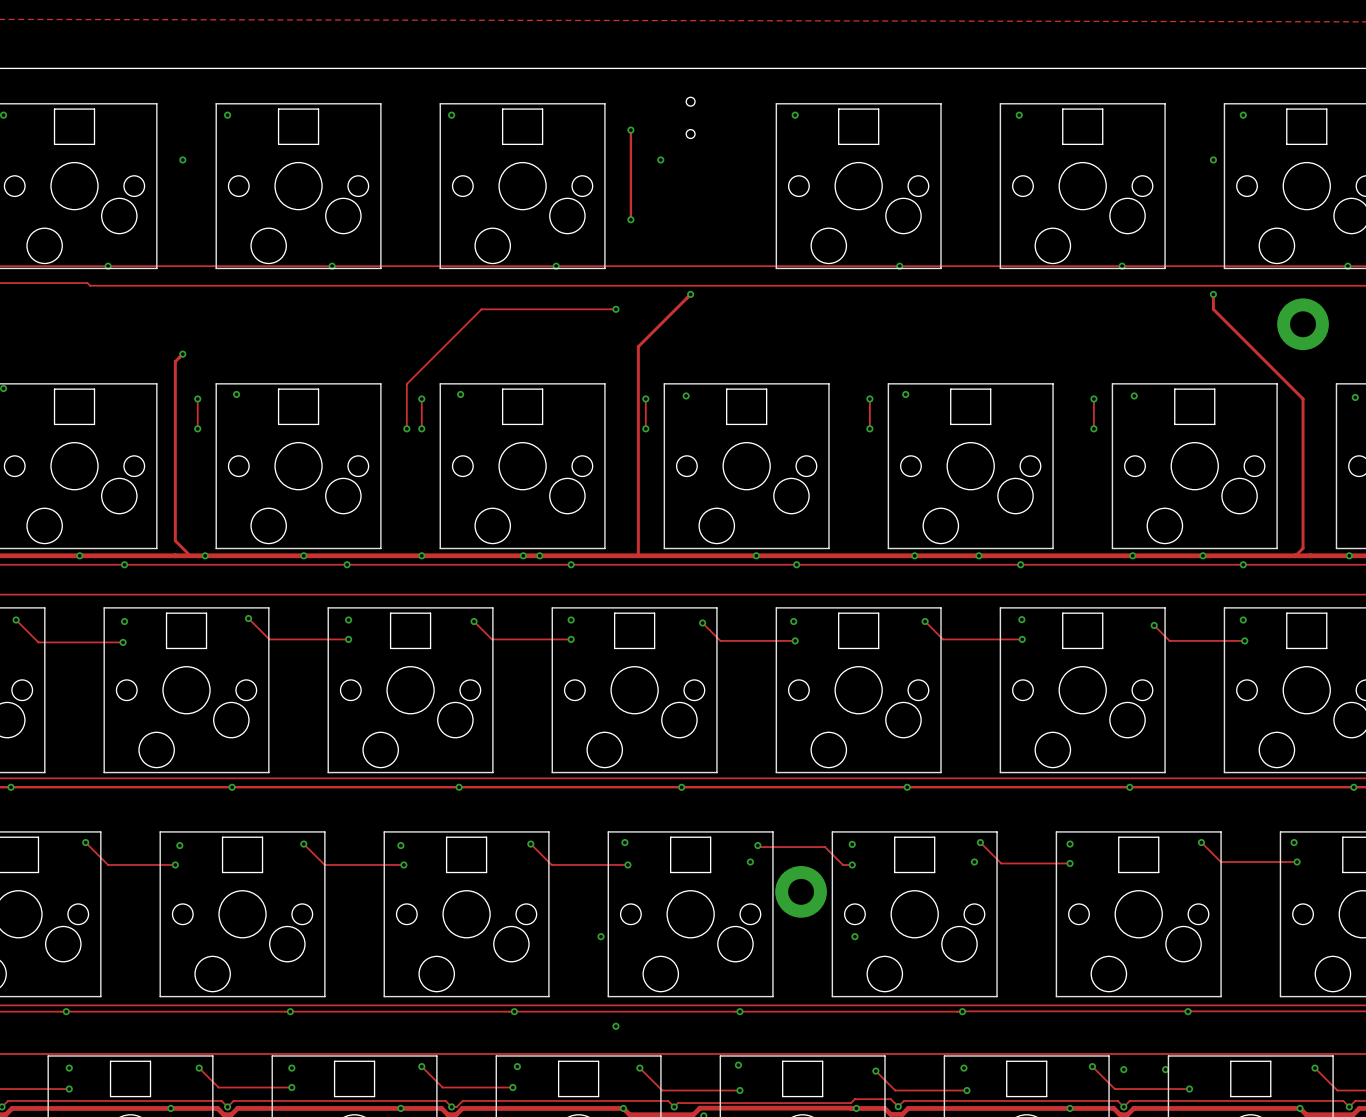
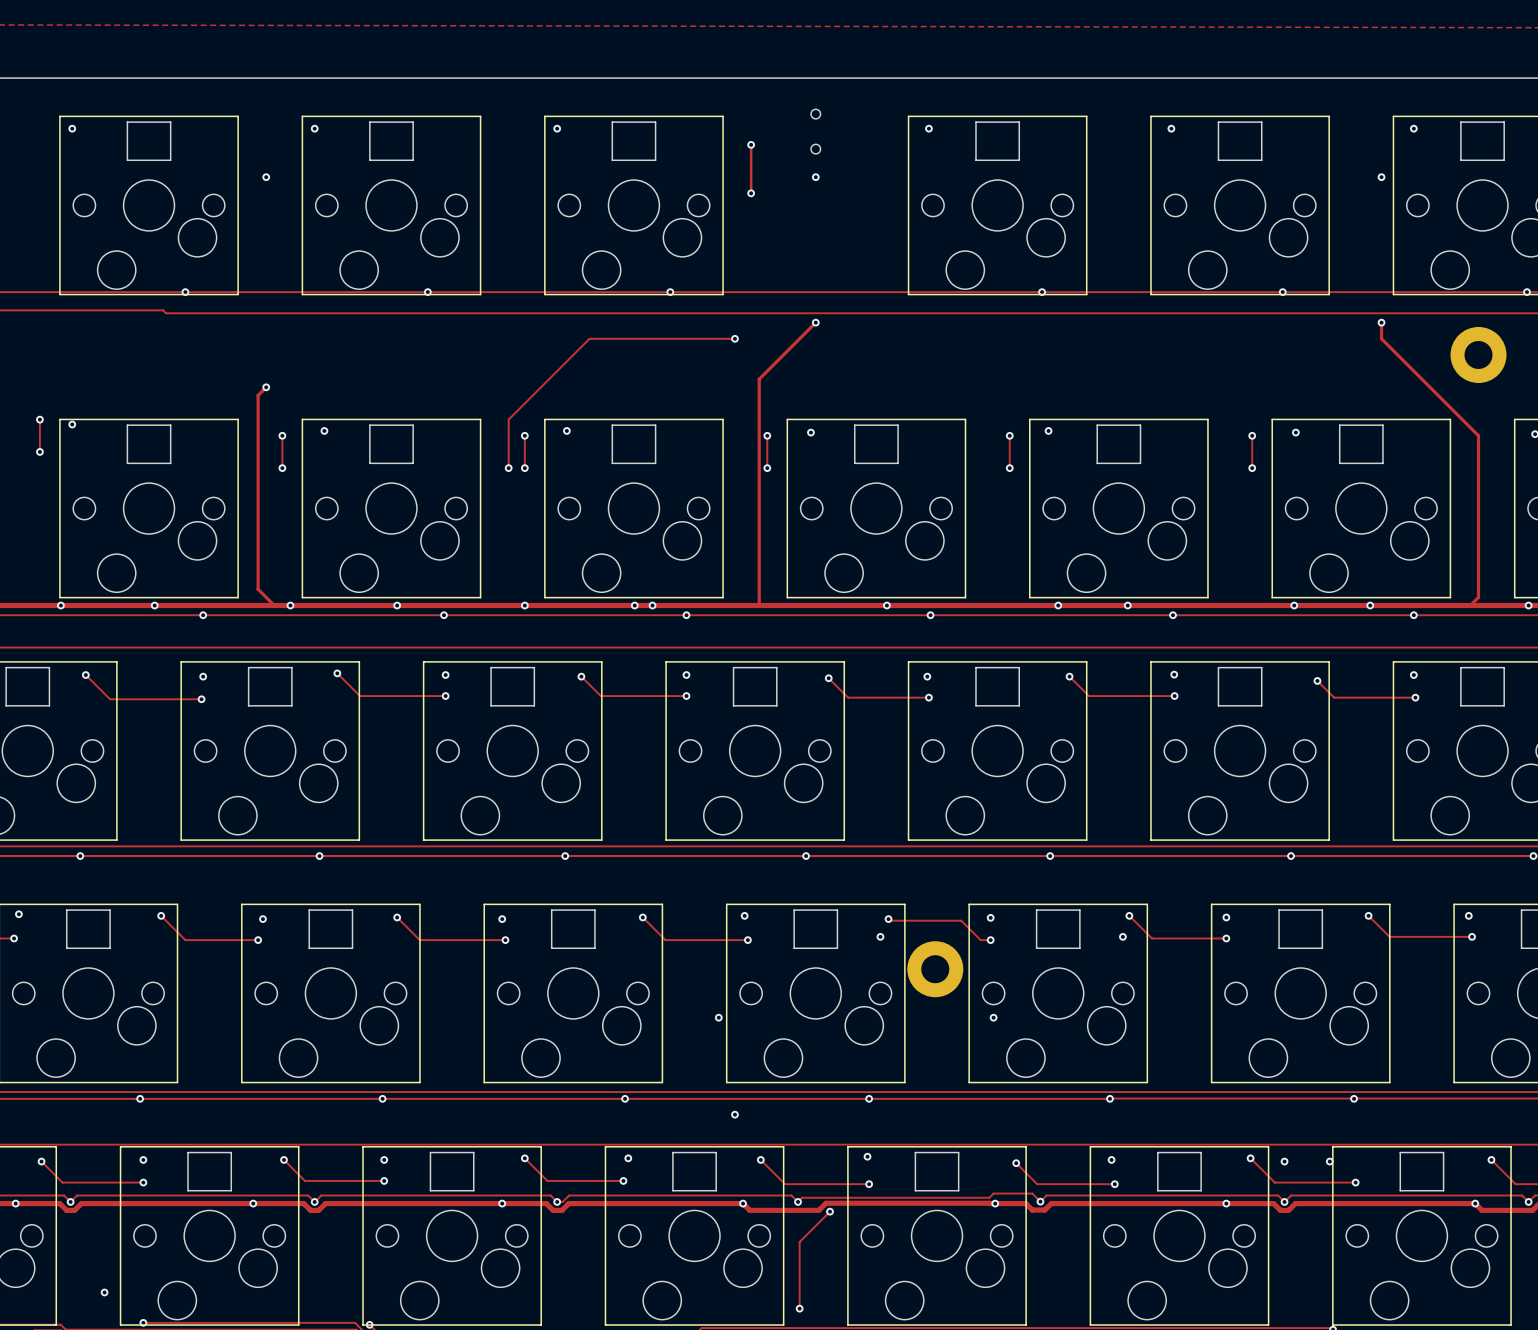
via: (660, 159) -> none
via: none -> (815, 177)
track: (630, 174) (630, 219) -> none
via: none -> (751, 193)
via: (630, 219) -> none

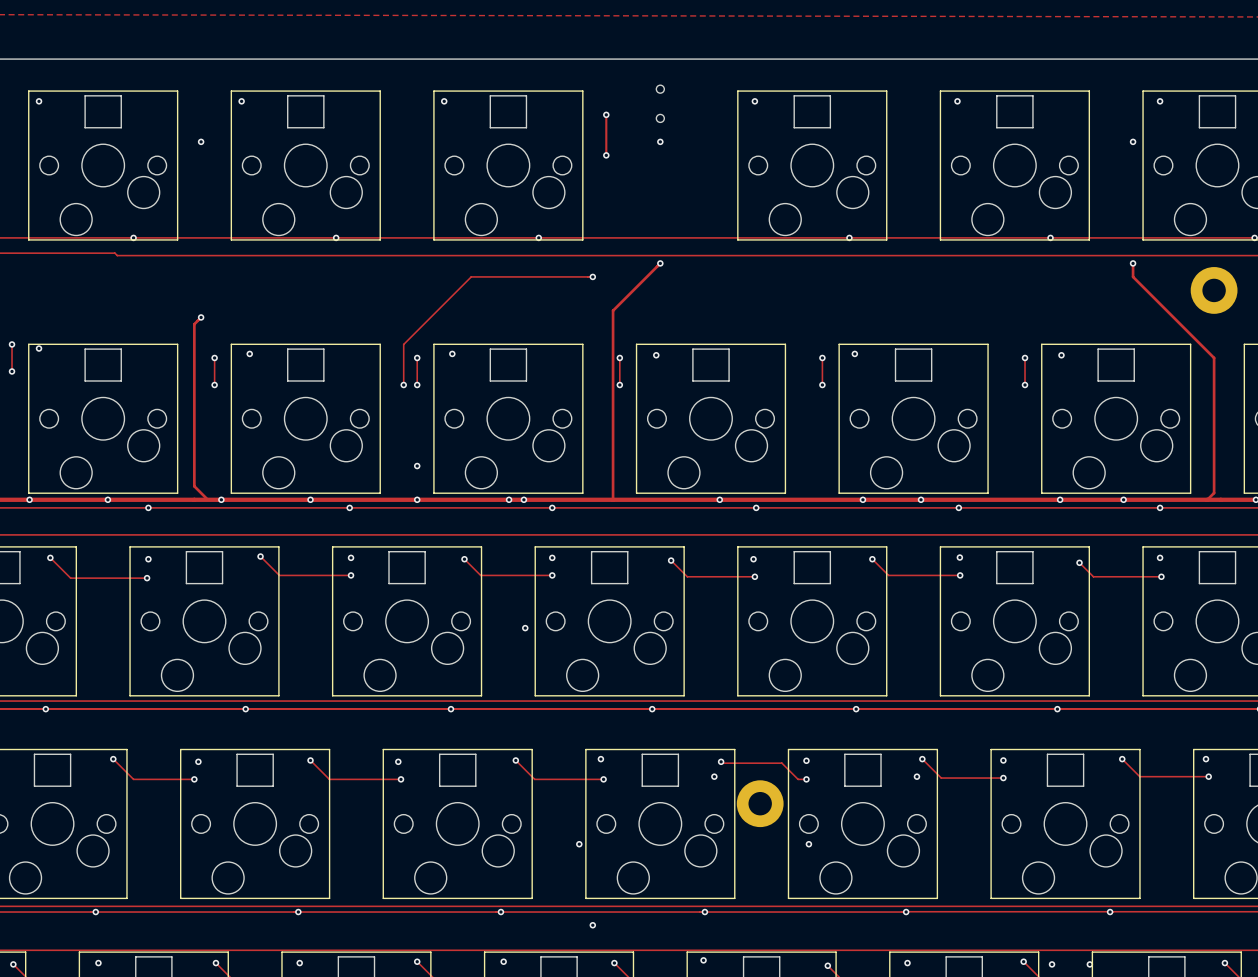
via: none -> (417, 466)
via: none -> (525, 628)

